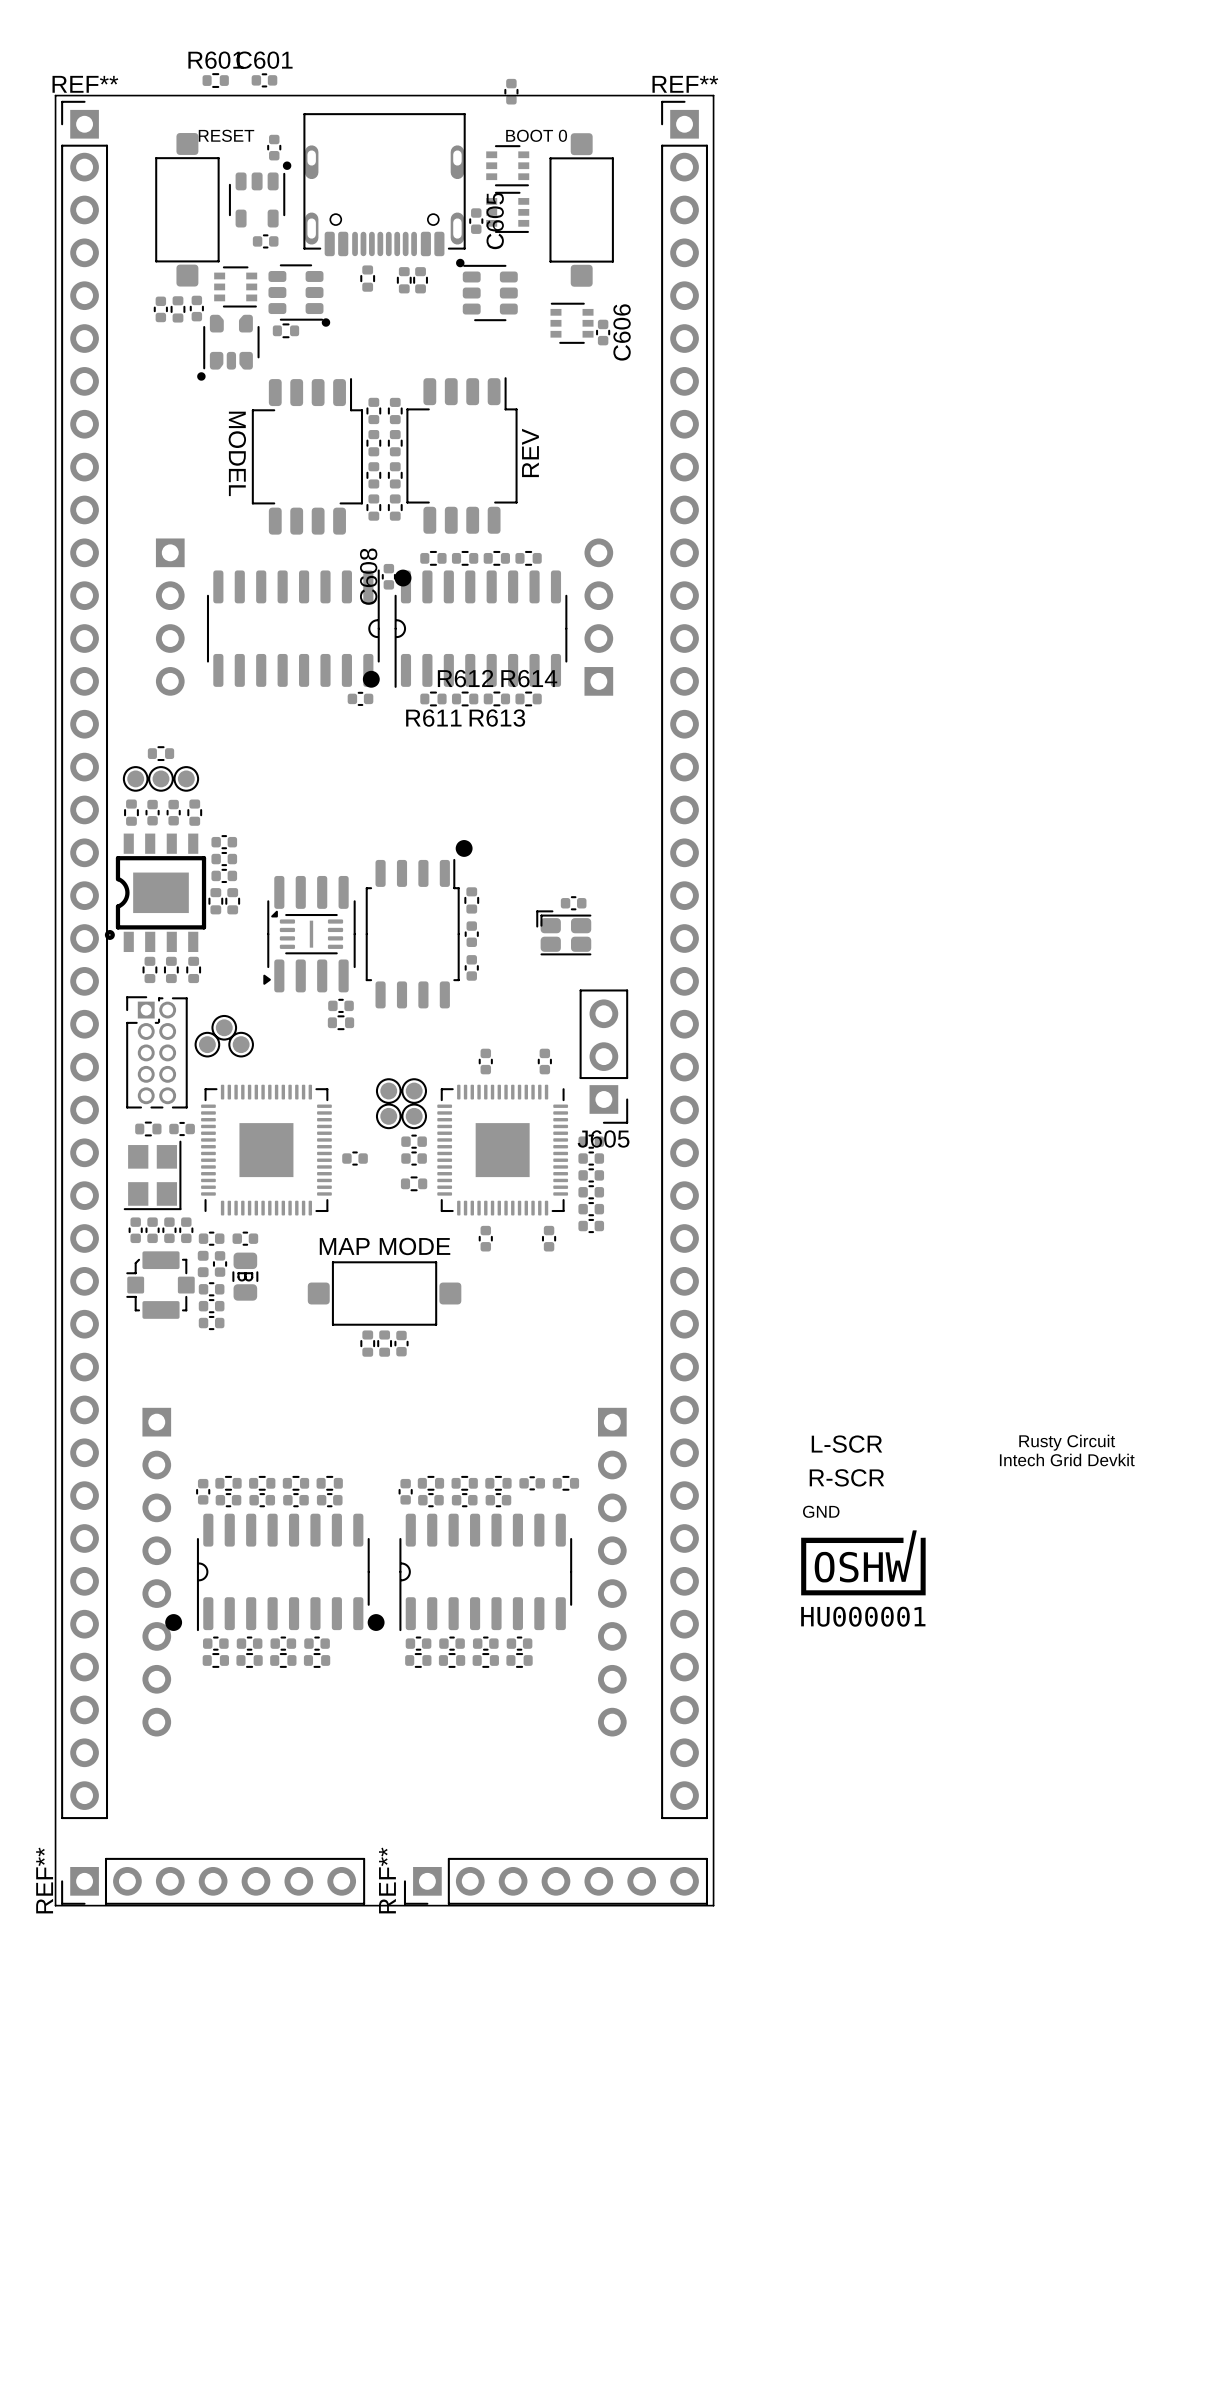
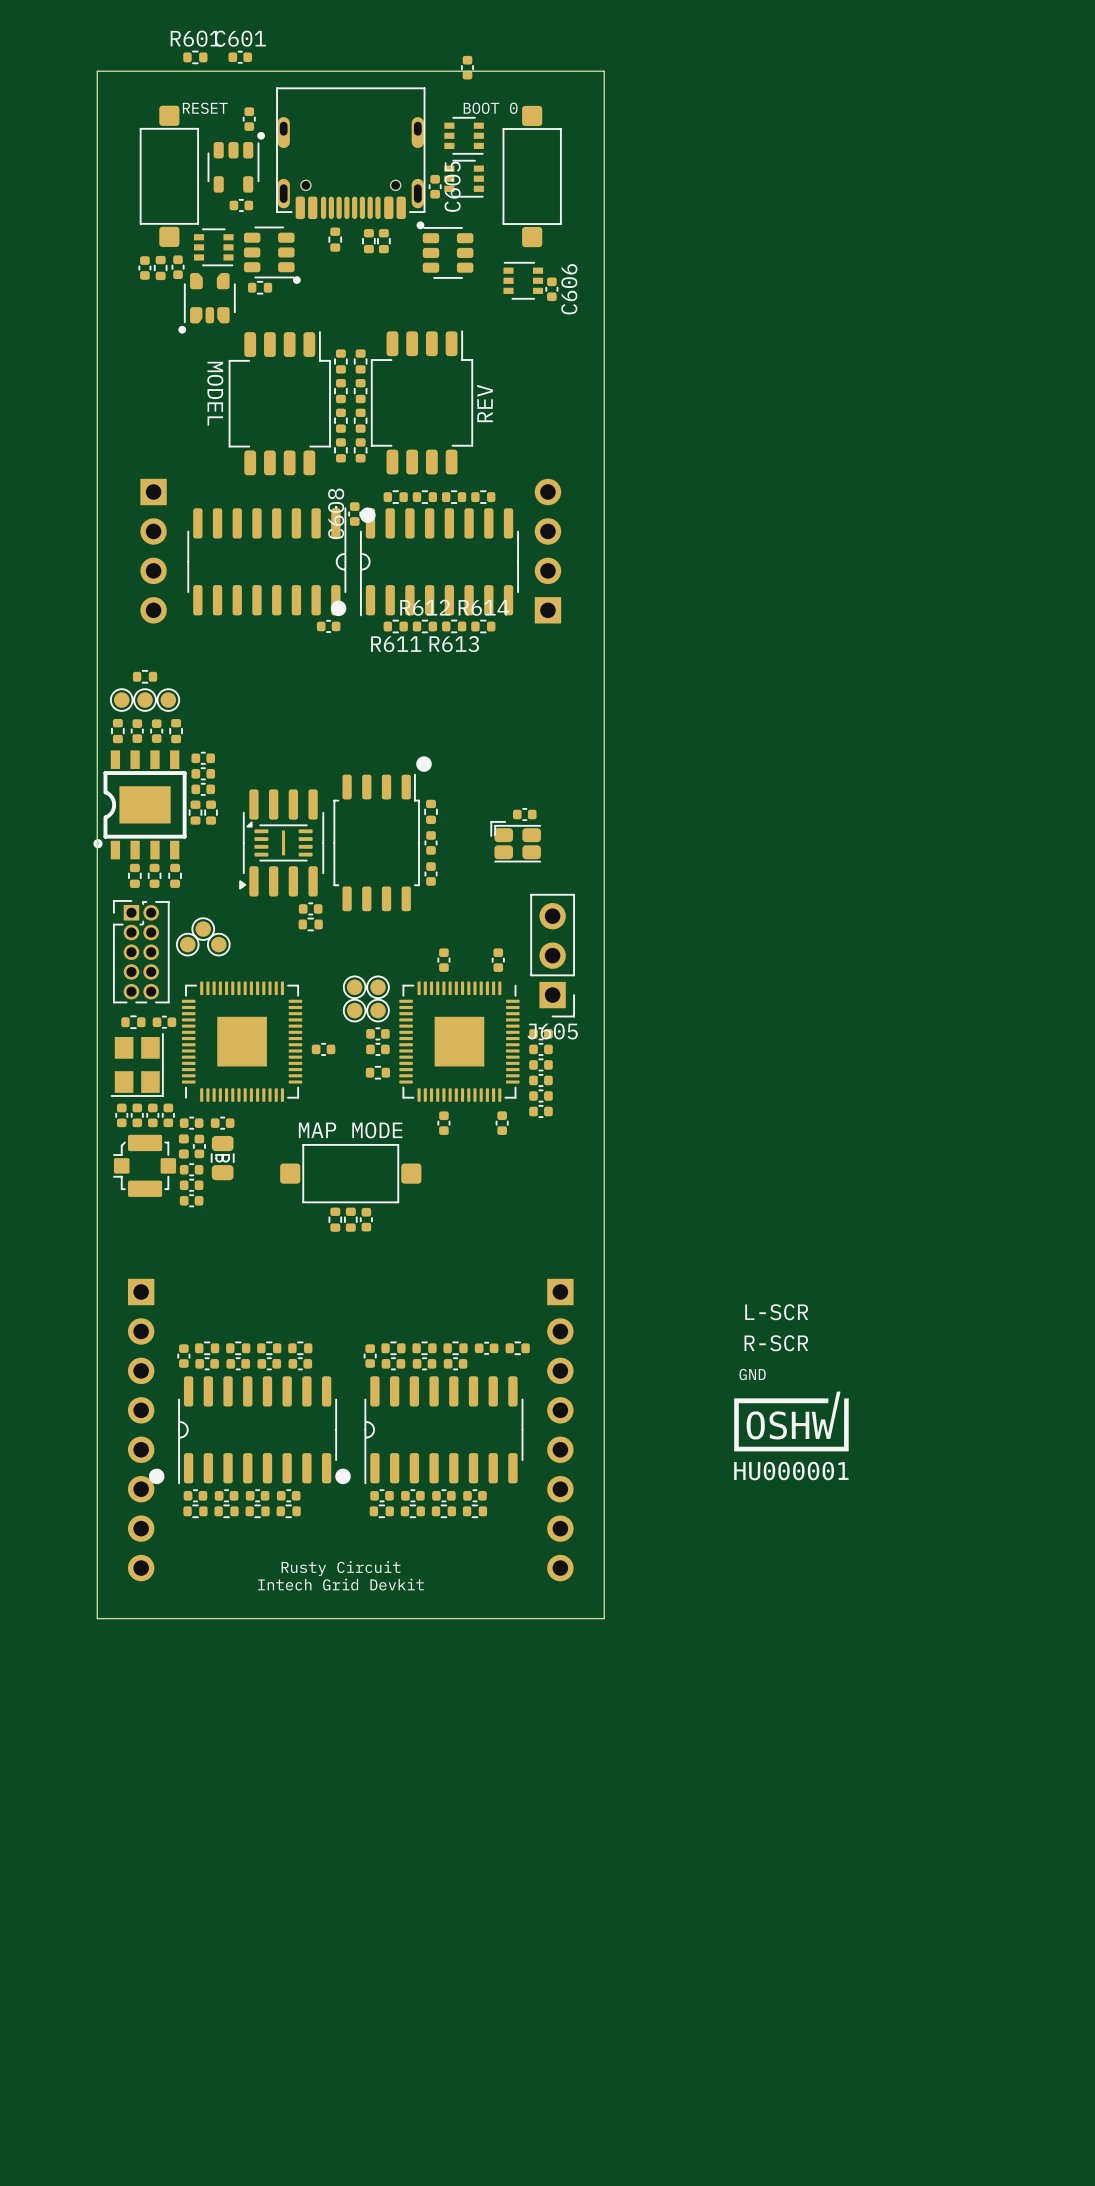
board edge: (109, 95) (55, 95) (55, 1905) (713, 1905) (713, 95) (659, 95) -> (97, 71) (97, 1618) (604, 1618) (604, 71)
REF**: (84, 959) -> none
REF**: (684, 959) -> none
text: Rusty Circuit (1067, 1442) -> none
text: Intech Grid Devkit (1067, 1460) -> none
text: none -> Rusty Circuit (341, 1568)
text: none -> Intech Grid Devkit (340, 1584)
REF**: (213, 1881) -> none
REF**: (555, 1881) -> none

